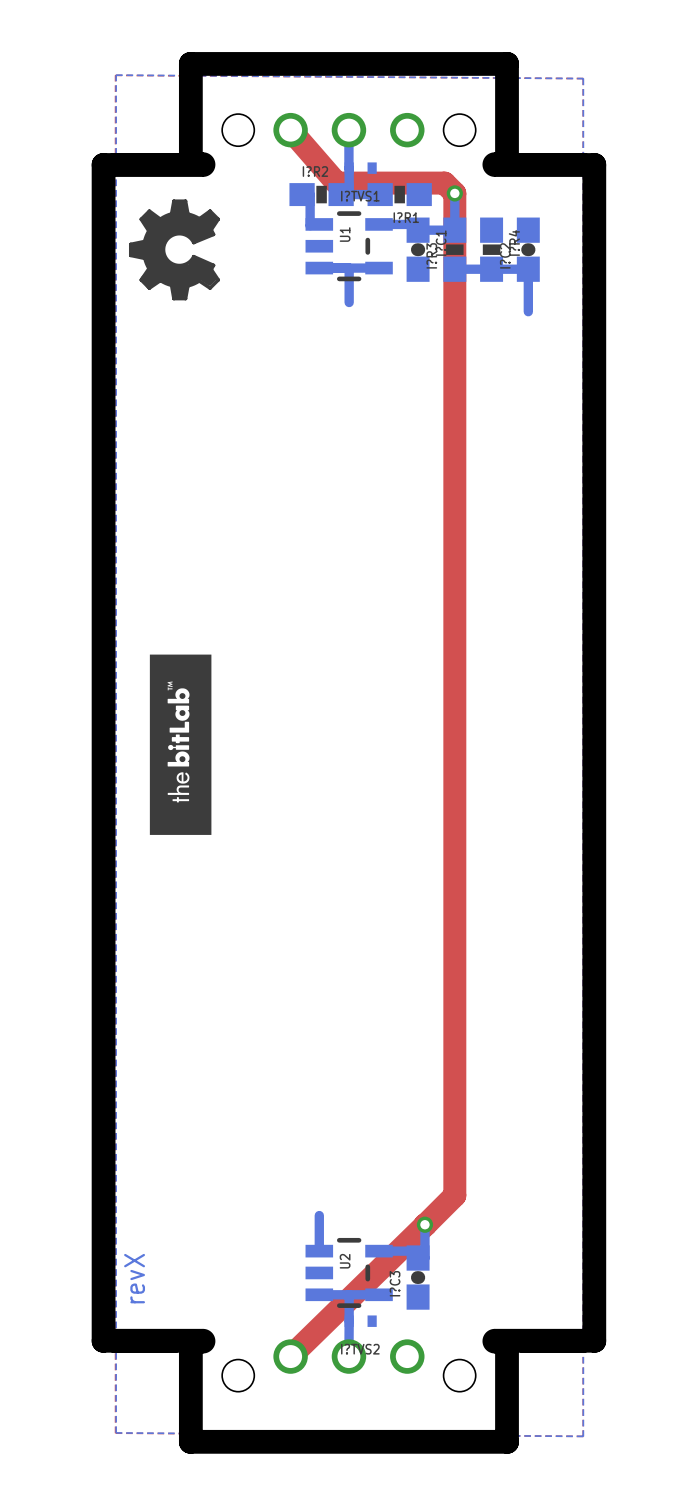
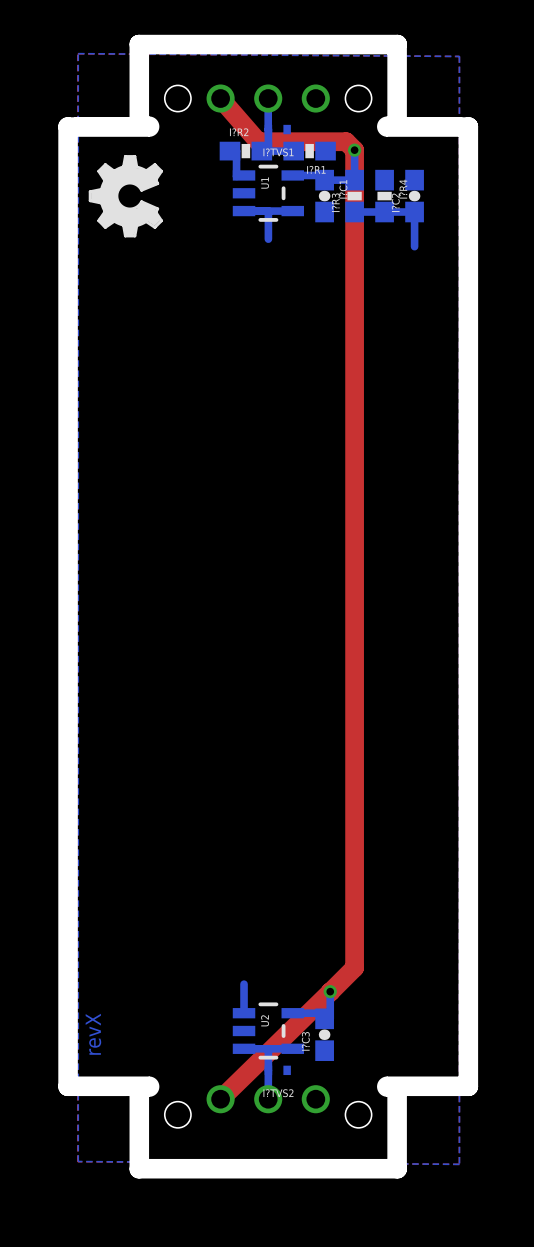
drawing: [149, 654, 212, 835] -> none

